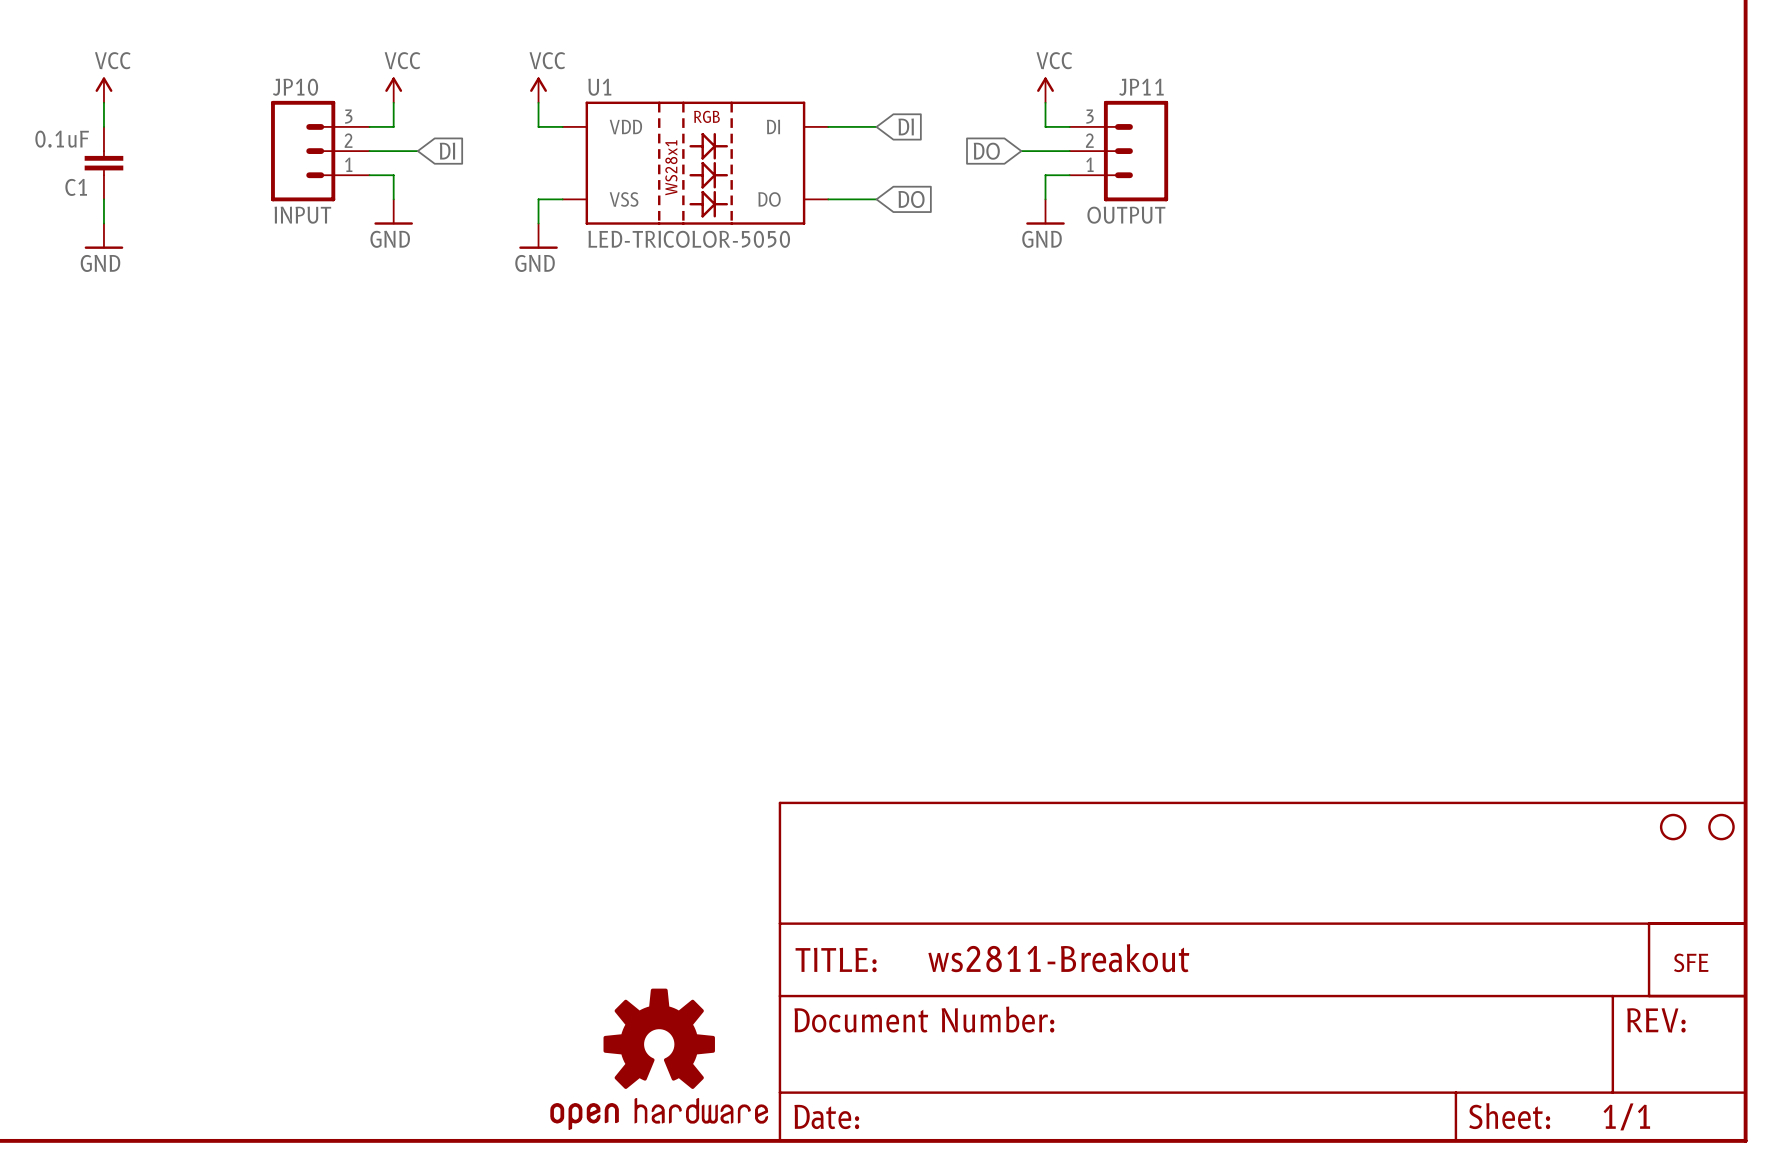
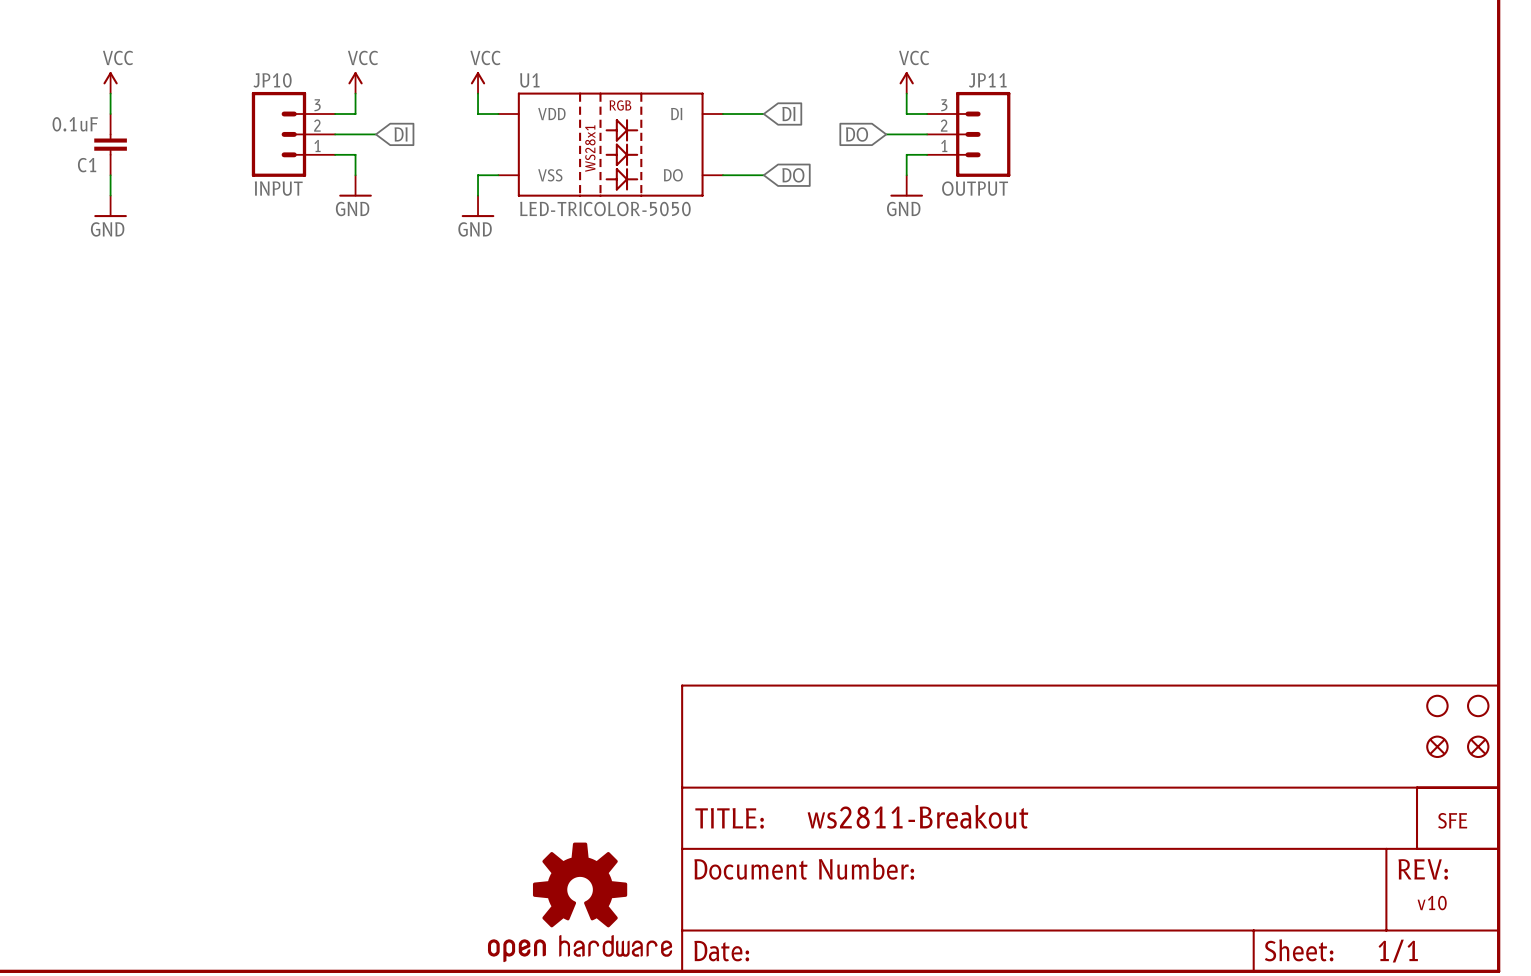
part: none -> (1437, 746)
part: none -> (1478, 746)
text: none -> v10 (1432, 903)

